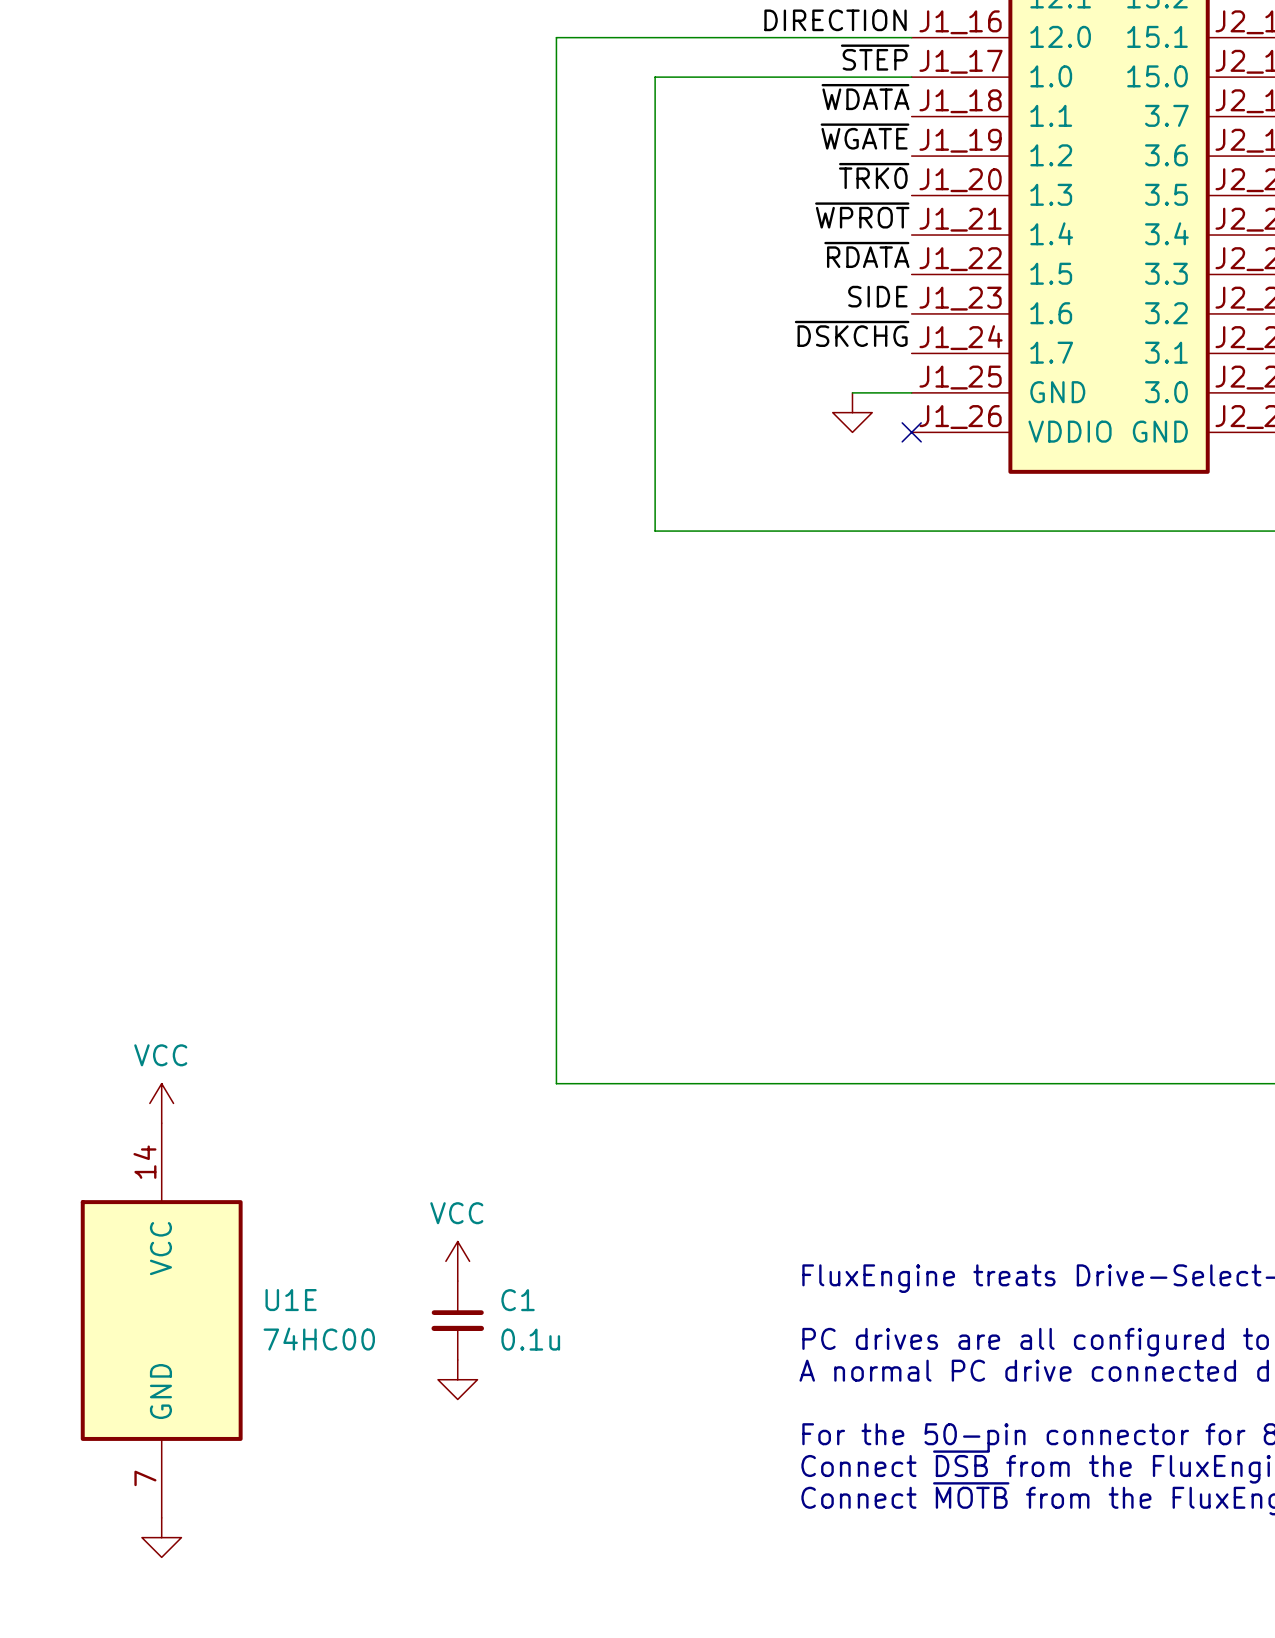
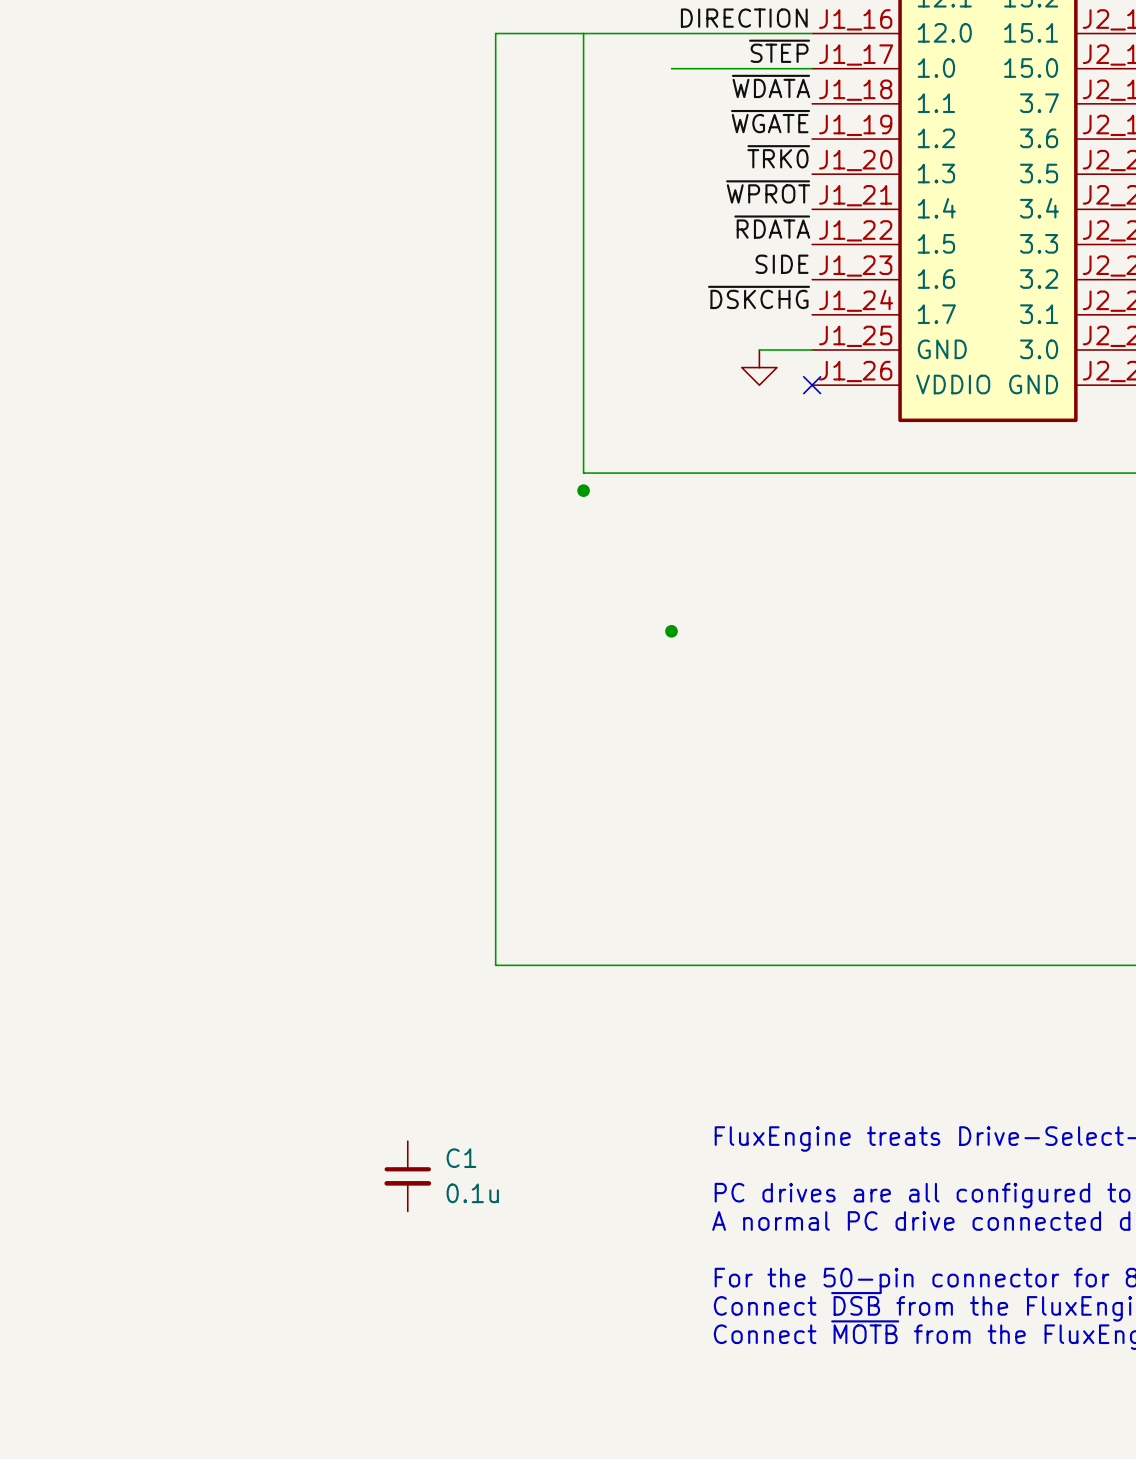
wire: (655, 77) (753, 77) -> (583, 68) (583, 33)
junction: none -> (583, 490)
junction: none -> (671, 631)
power symbol: VCC (161, 1103) -> none
power symbol: VCC (457, 1261) -> none
U1E: 74HC00 (161, 1320) -> none
power symbol: (457, 1379) -> none
power symbol: (161, 1537) -> none

